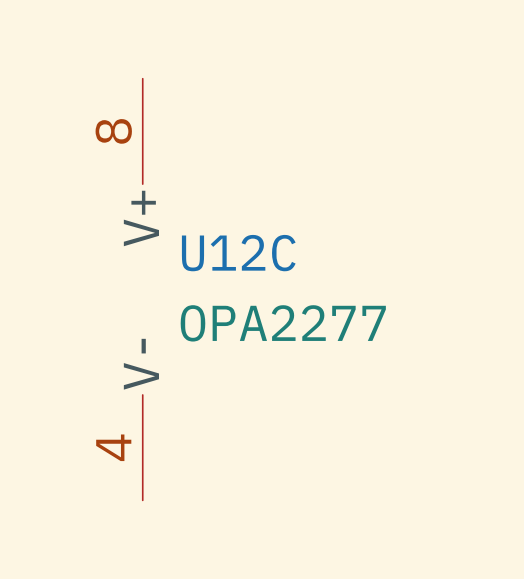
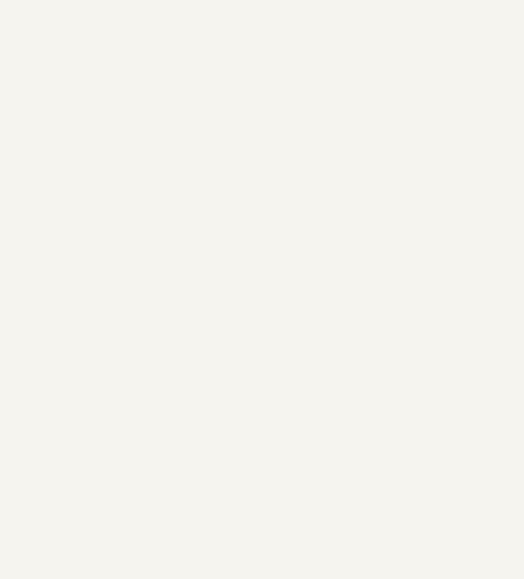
U12C: OPA2277 (142, 289) -> none

